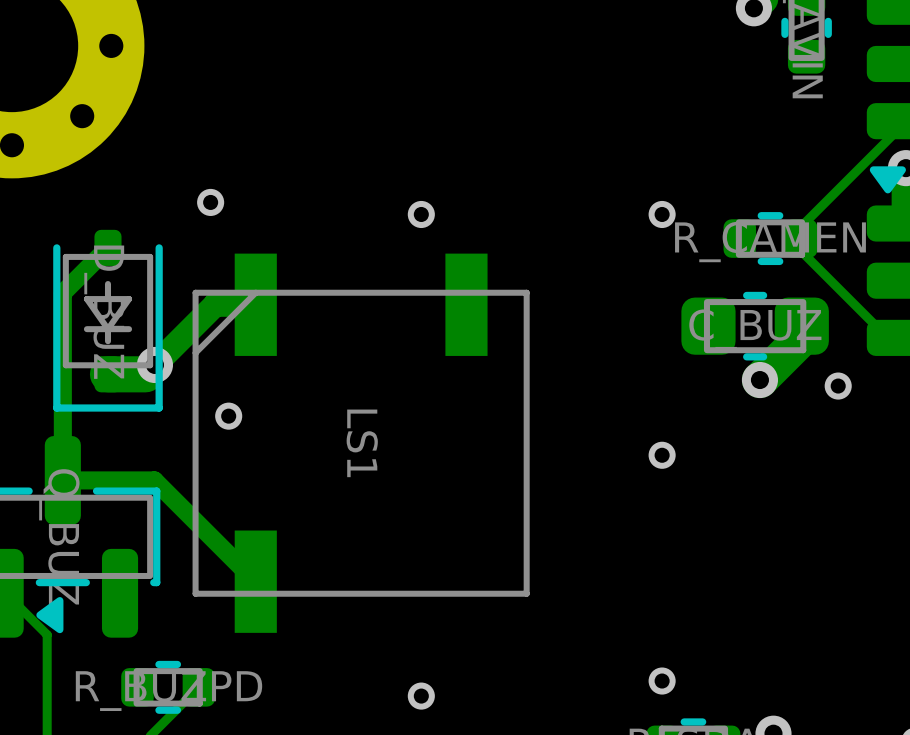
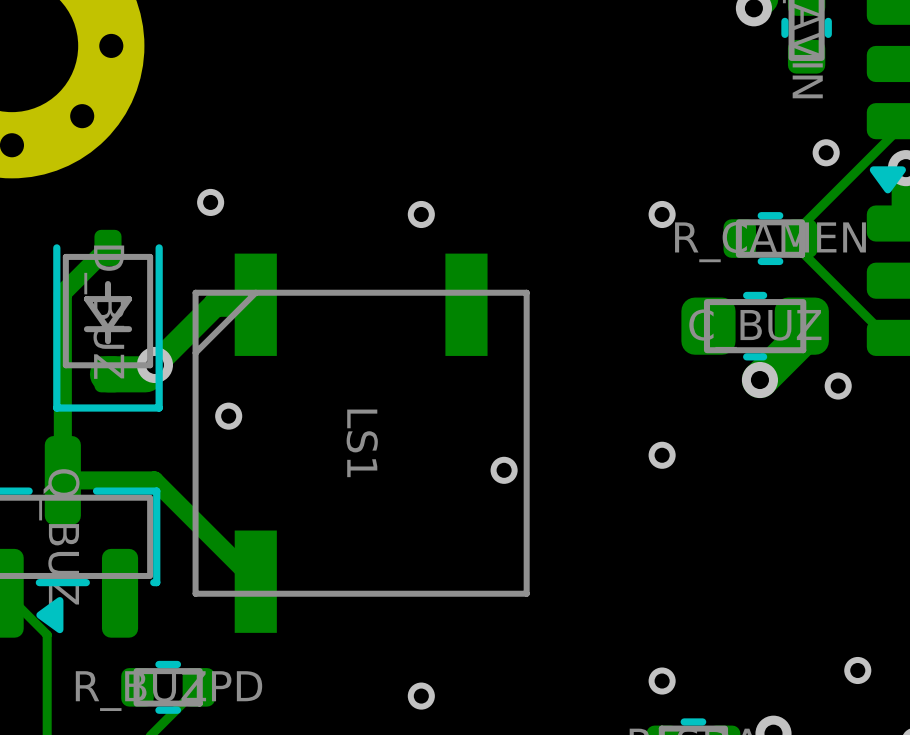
via: none -> (826, 152)
via: none -> (504, 470)
via: none -> (857, 670)

